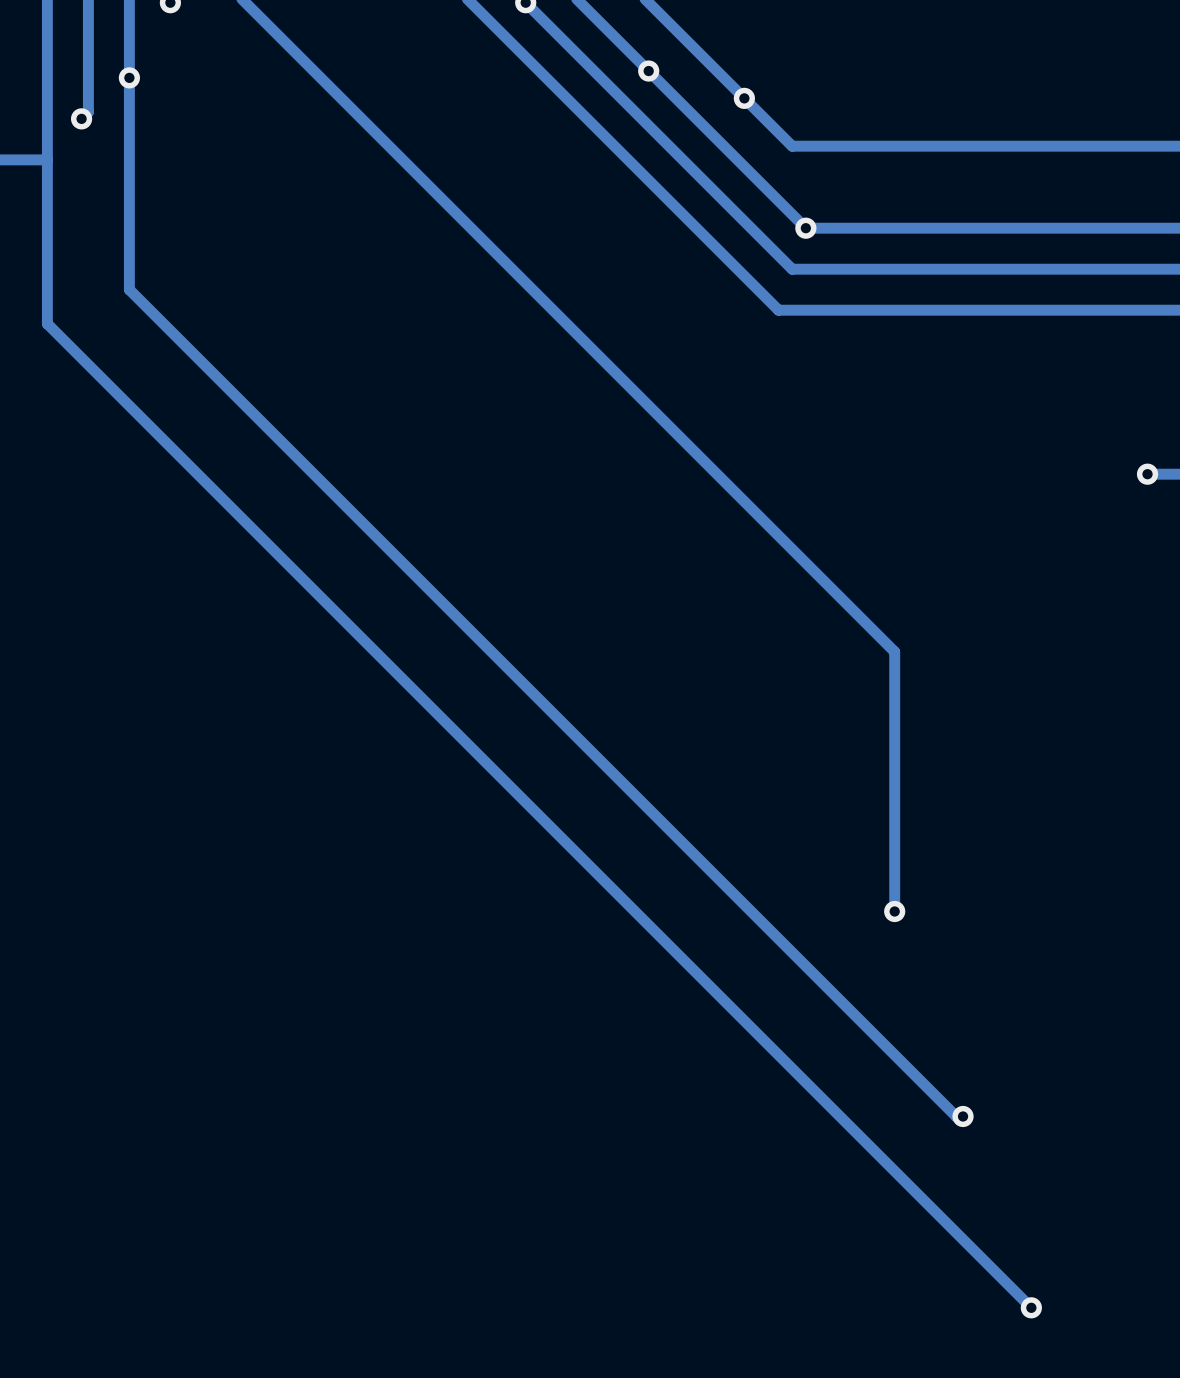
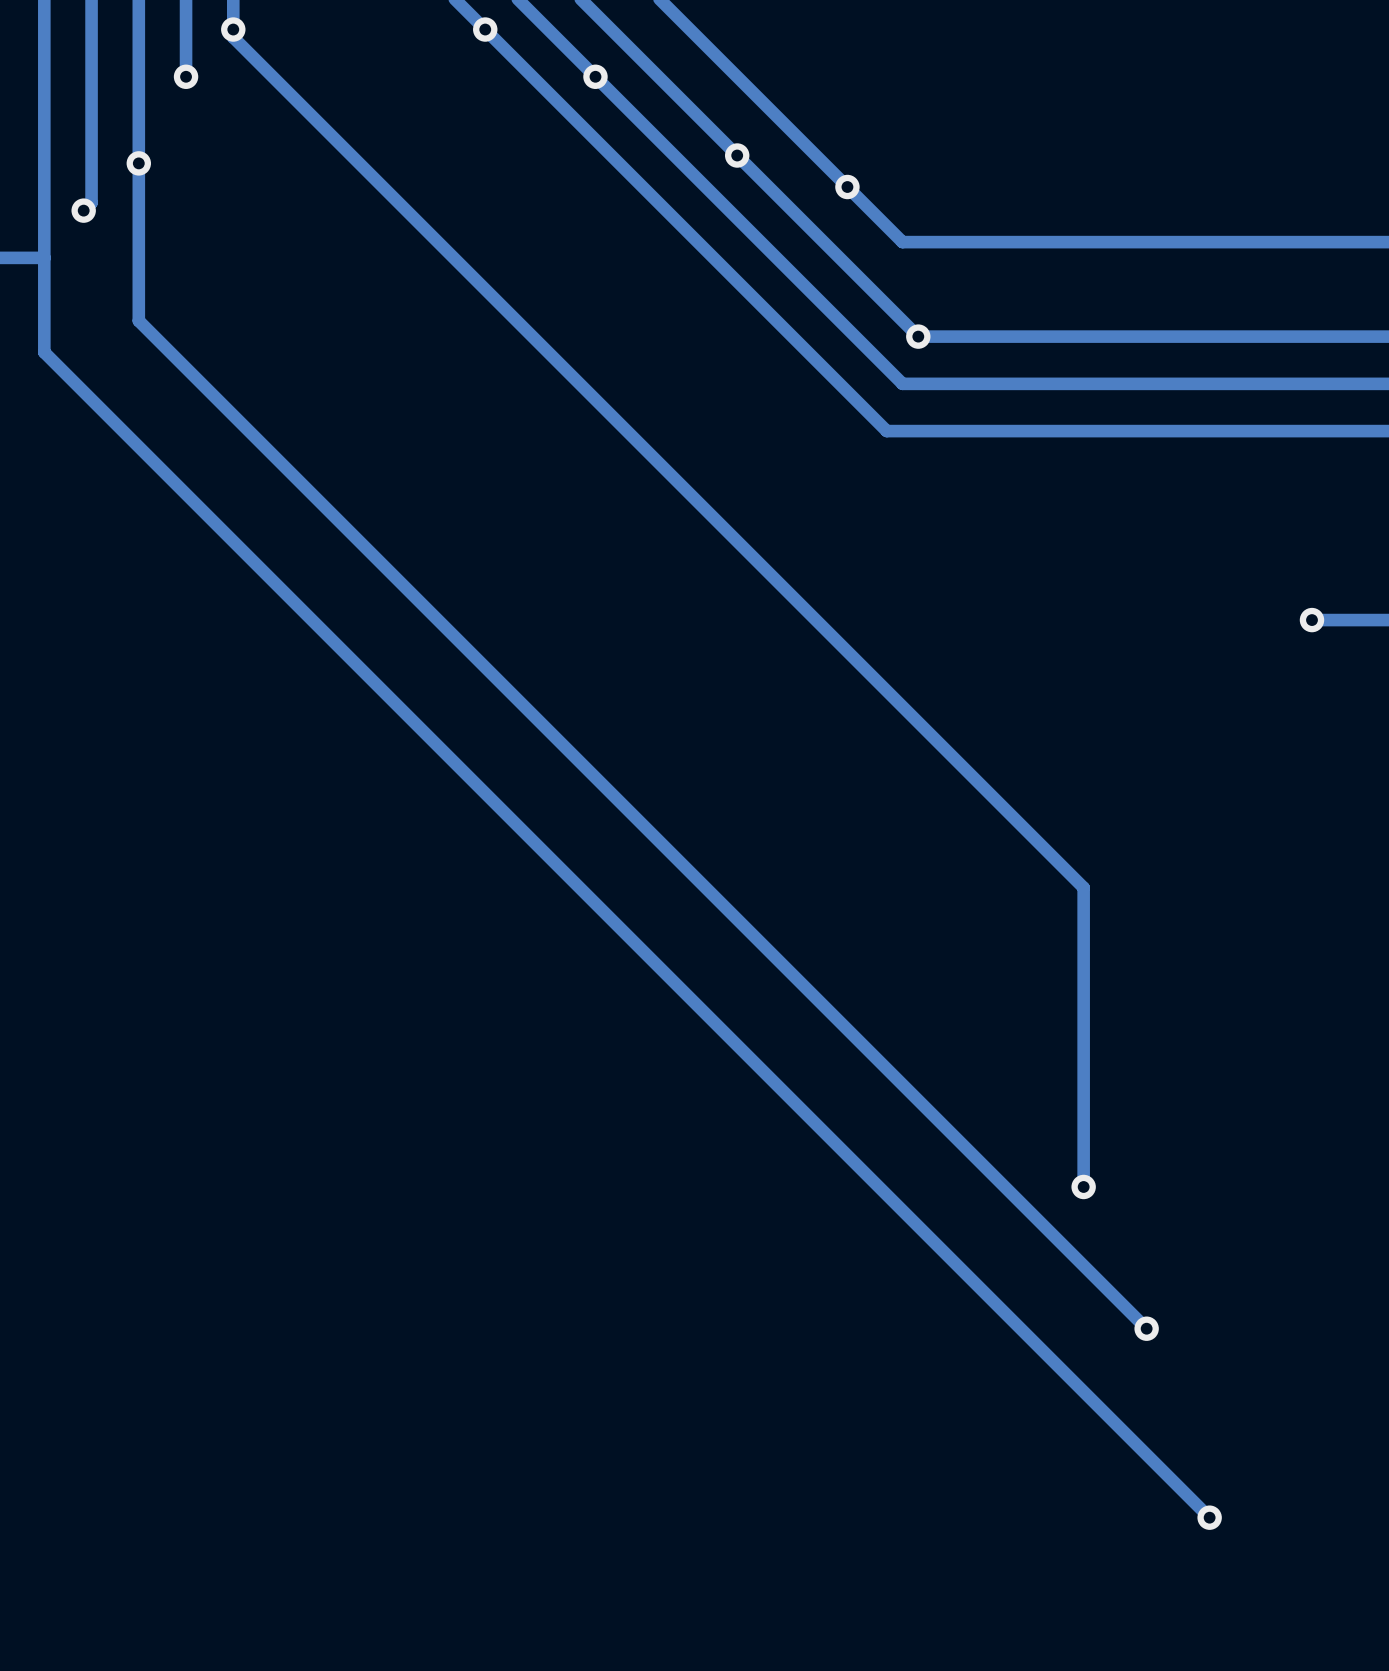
track: (129, 214) (129, 289) (956, 1116) (963, 1116) -> (138, 320) (1146, 1328)
track: (47, 241) (47, 323) (1031, 1307) -> (44, 352) (1209, 1517)
track: (894, 651) (894, 911) -> (1020, 824) (1083, 887) (1083, 1186)
via: (894, 911) -> none
via: none -> (1083, 1186)
via position: (963, 1116) -> (1146, 1328)
via position: (1031, 1307) -> (1209, 1517)

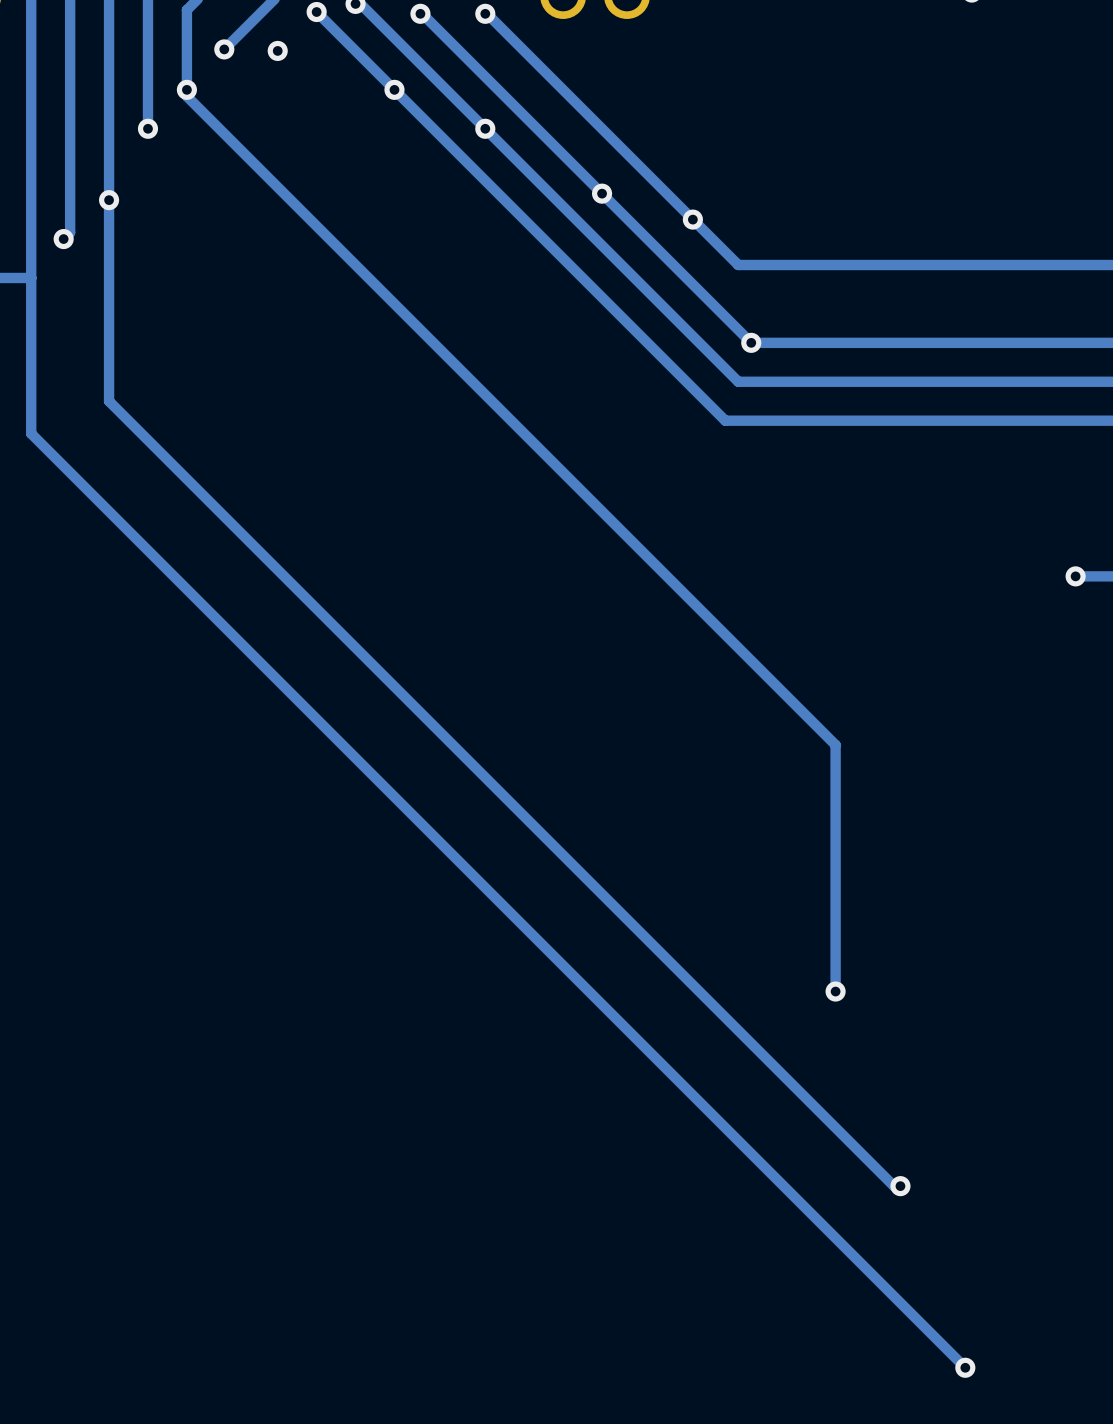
track: (138, 320) (1146, 1328) -> (109, 329) (109, 401) (893, 1186) (900, 1186)
track: (44, 352) (1209, 1517) -> (31, 355) (31, 433) (965, 1367)
track: (1020, 824) (1083, 887) (1083, 1186) -> (835, 745) (835, 991)
via: none -> (835, 991)
via: (1083, 1186) -> none
via position: (1146, 1328) -> (900, 1186)
via position: (1209, 1517) -> (965, 1367)

